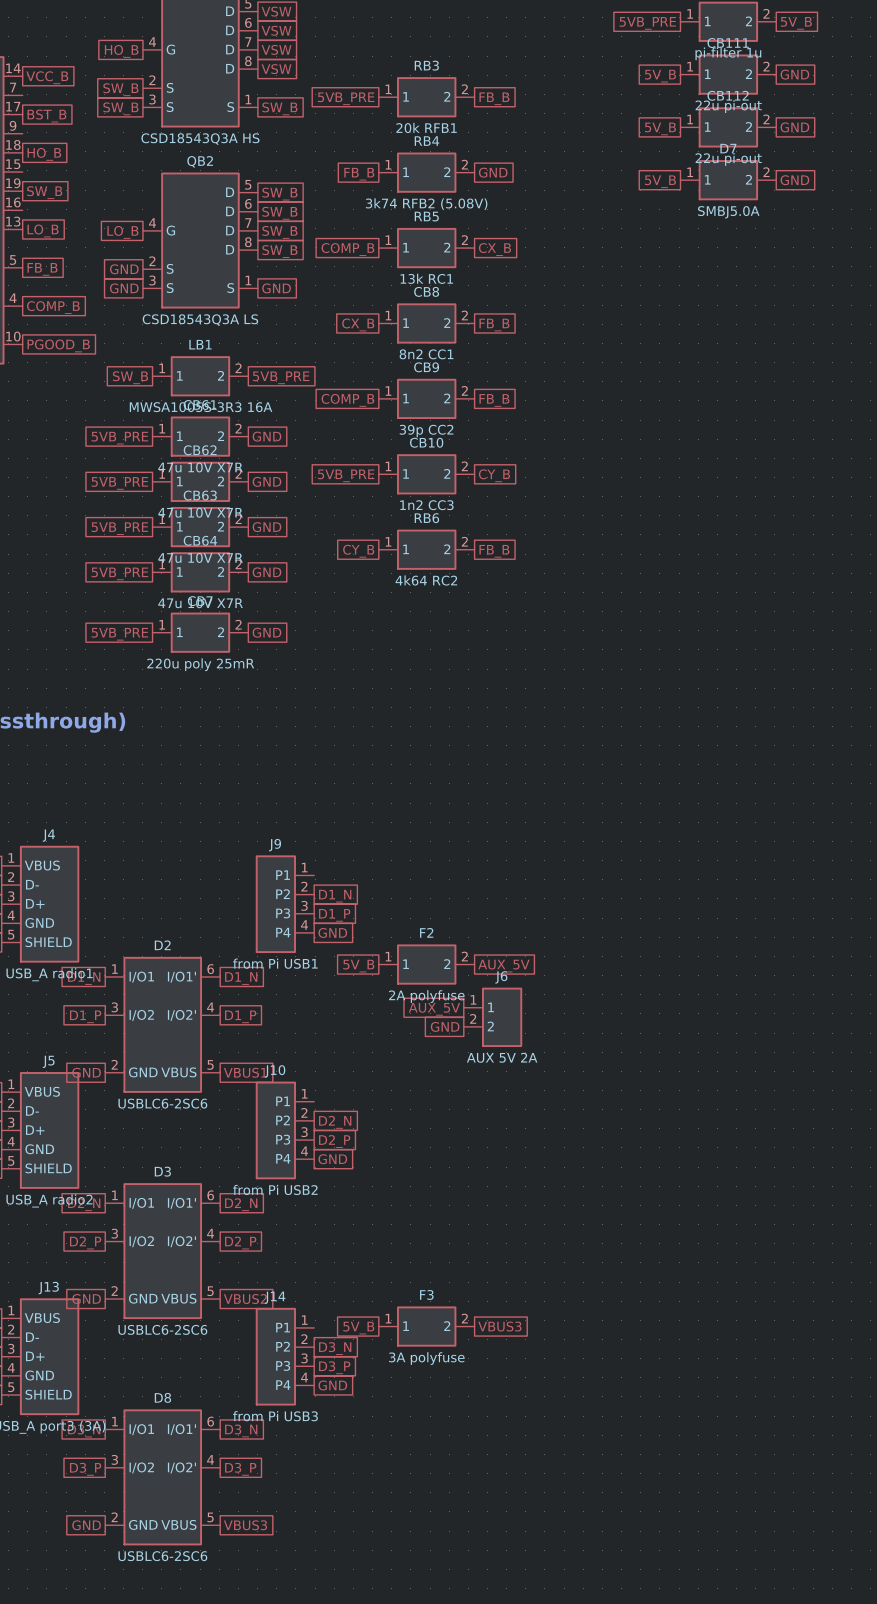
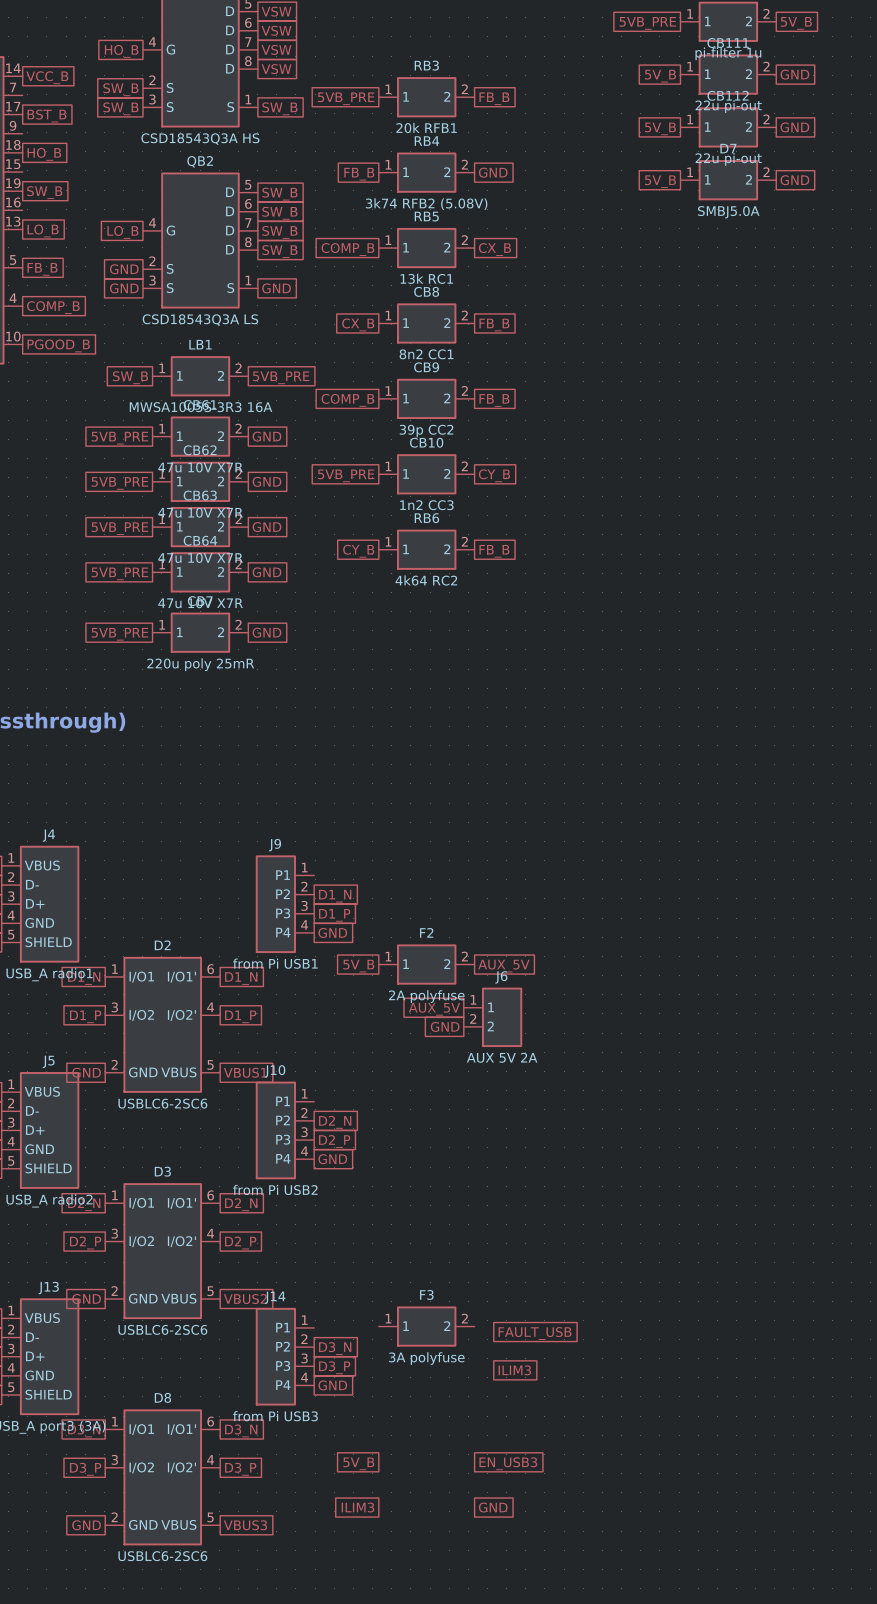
global label: VBUS3 (499, 1326) -> none
global label position: 5V_B (358, 1328) -> 5V_B (358, 1463)
global label: none -> FAULT_USB (535, 1333)
global label: none -> ILIM3 (514, 1370)
global label: none -> EN_USB3 (508, 1463)
global label: none -> ILIM3 (357, 1507)
global label: none -> GND (493, 1507)

